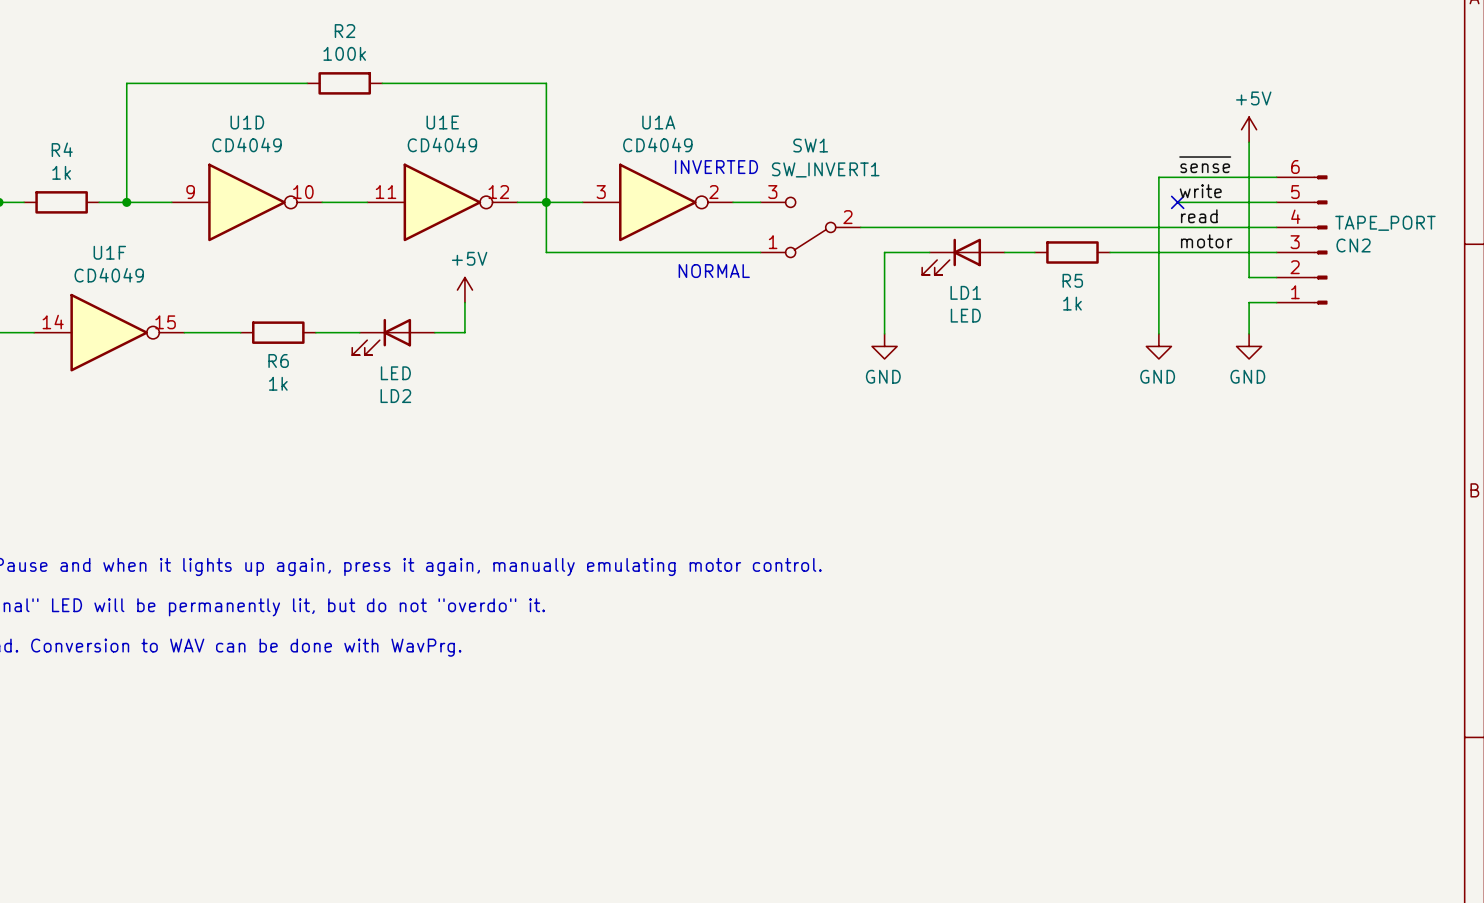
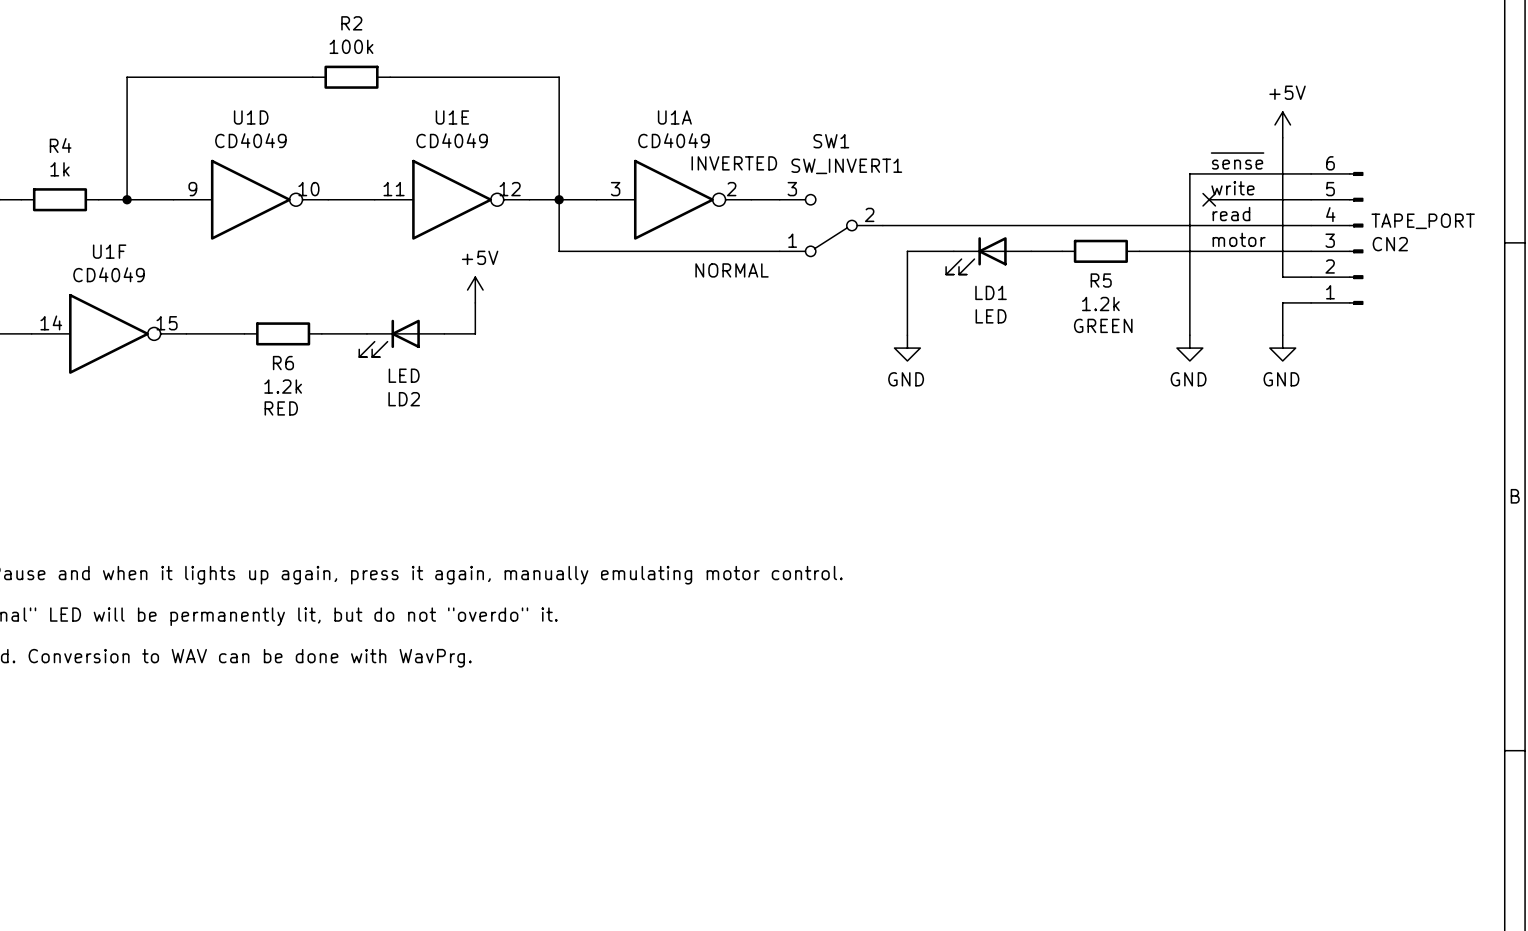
R5 value: 1k (1072, 303) -> 1.2k (1100, 304)
text: none -> GREEN (1103, 325)
R6 value: 1k (278, 383) -> 1.2k (283, 386)
text: none -> RED (281, 408)

